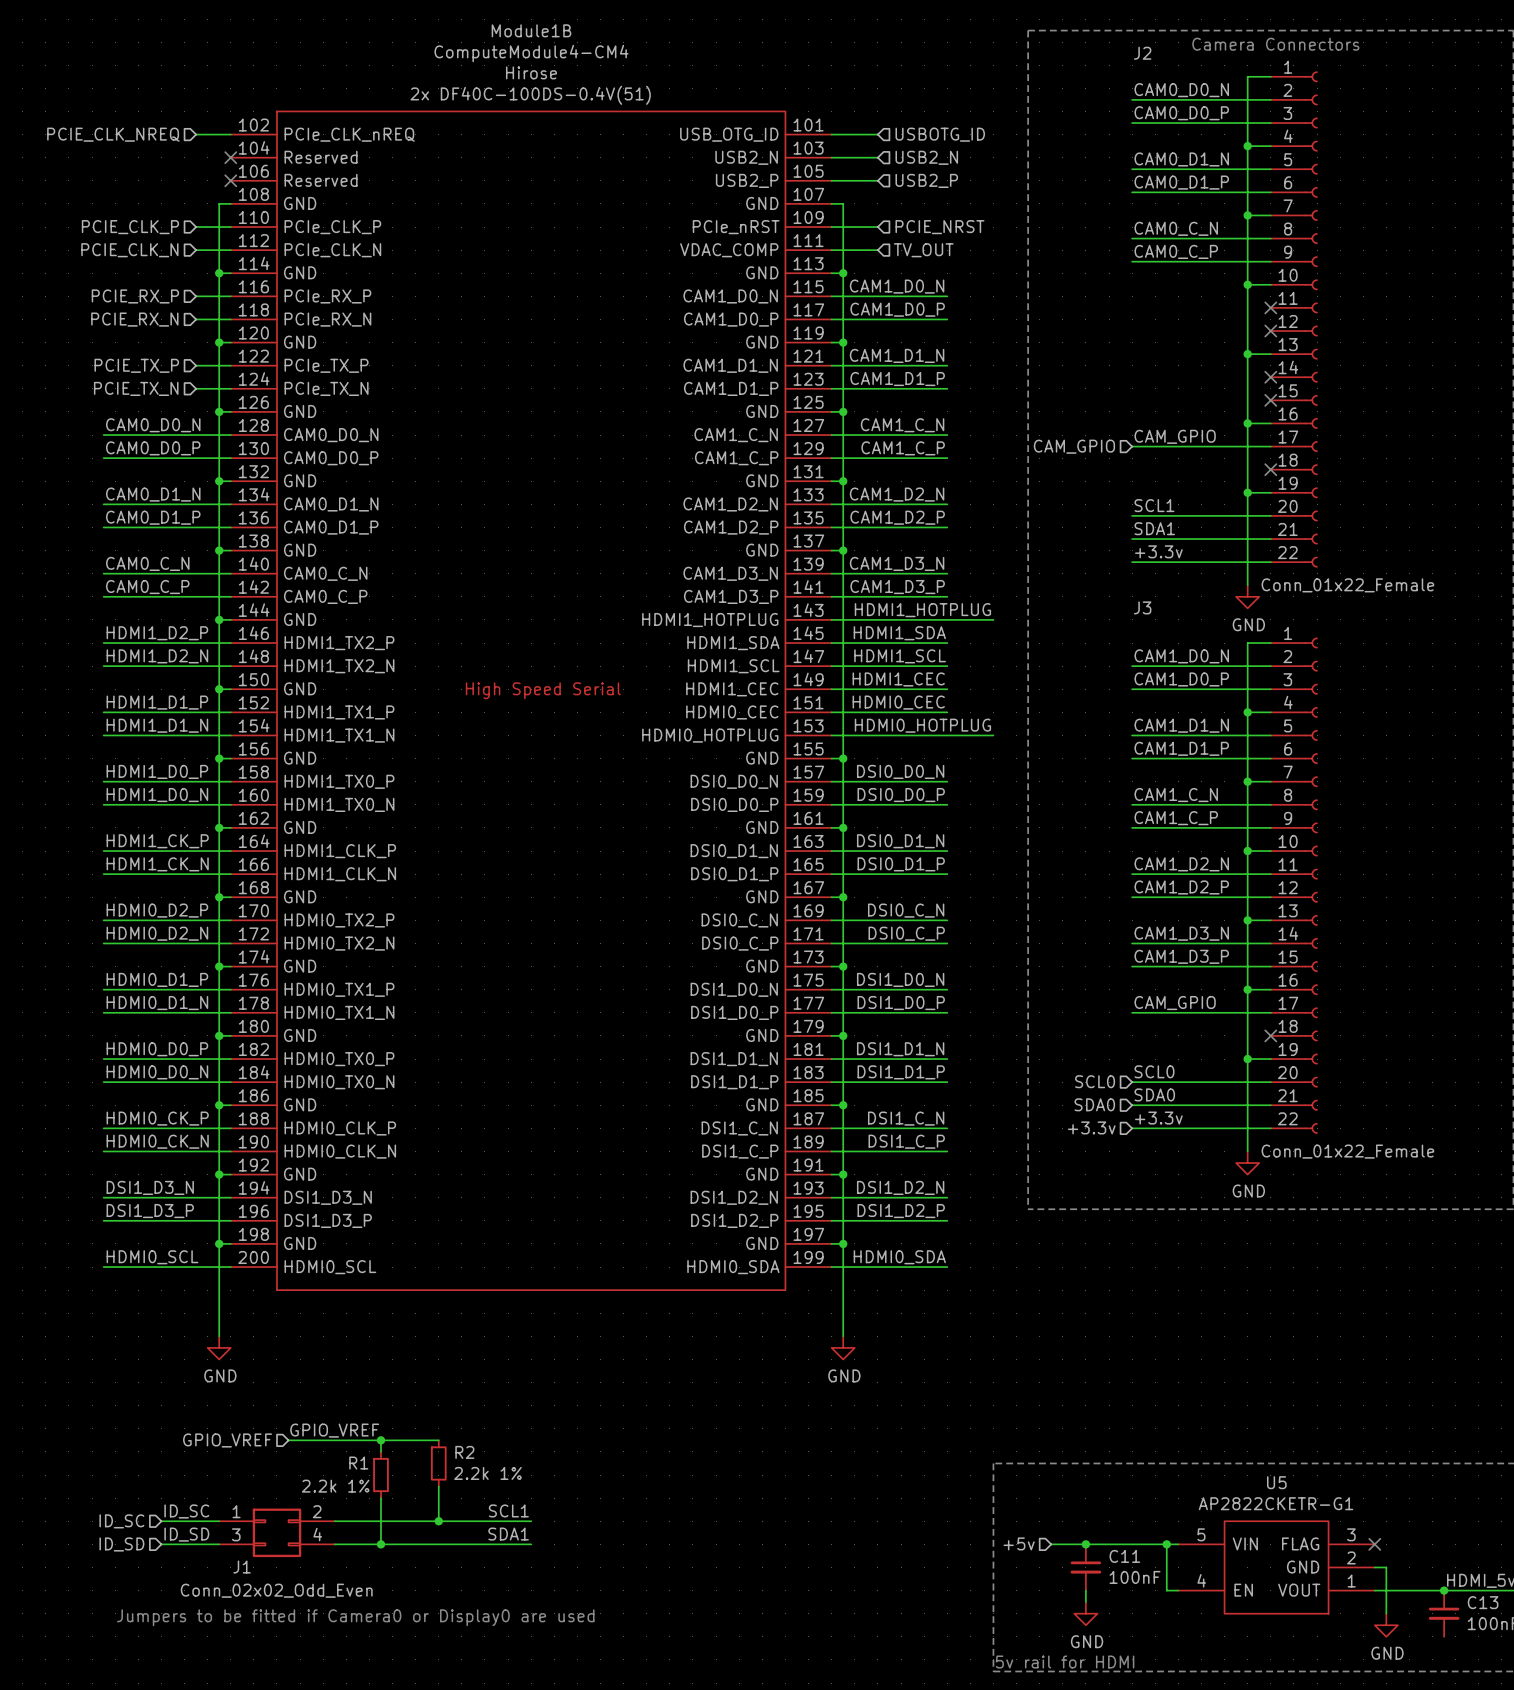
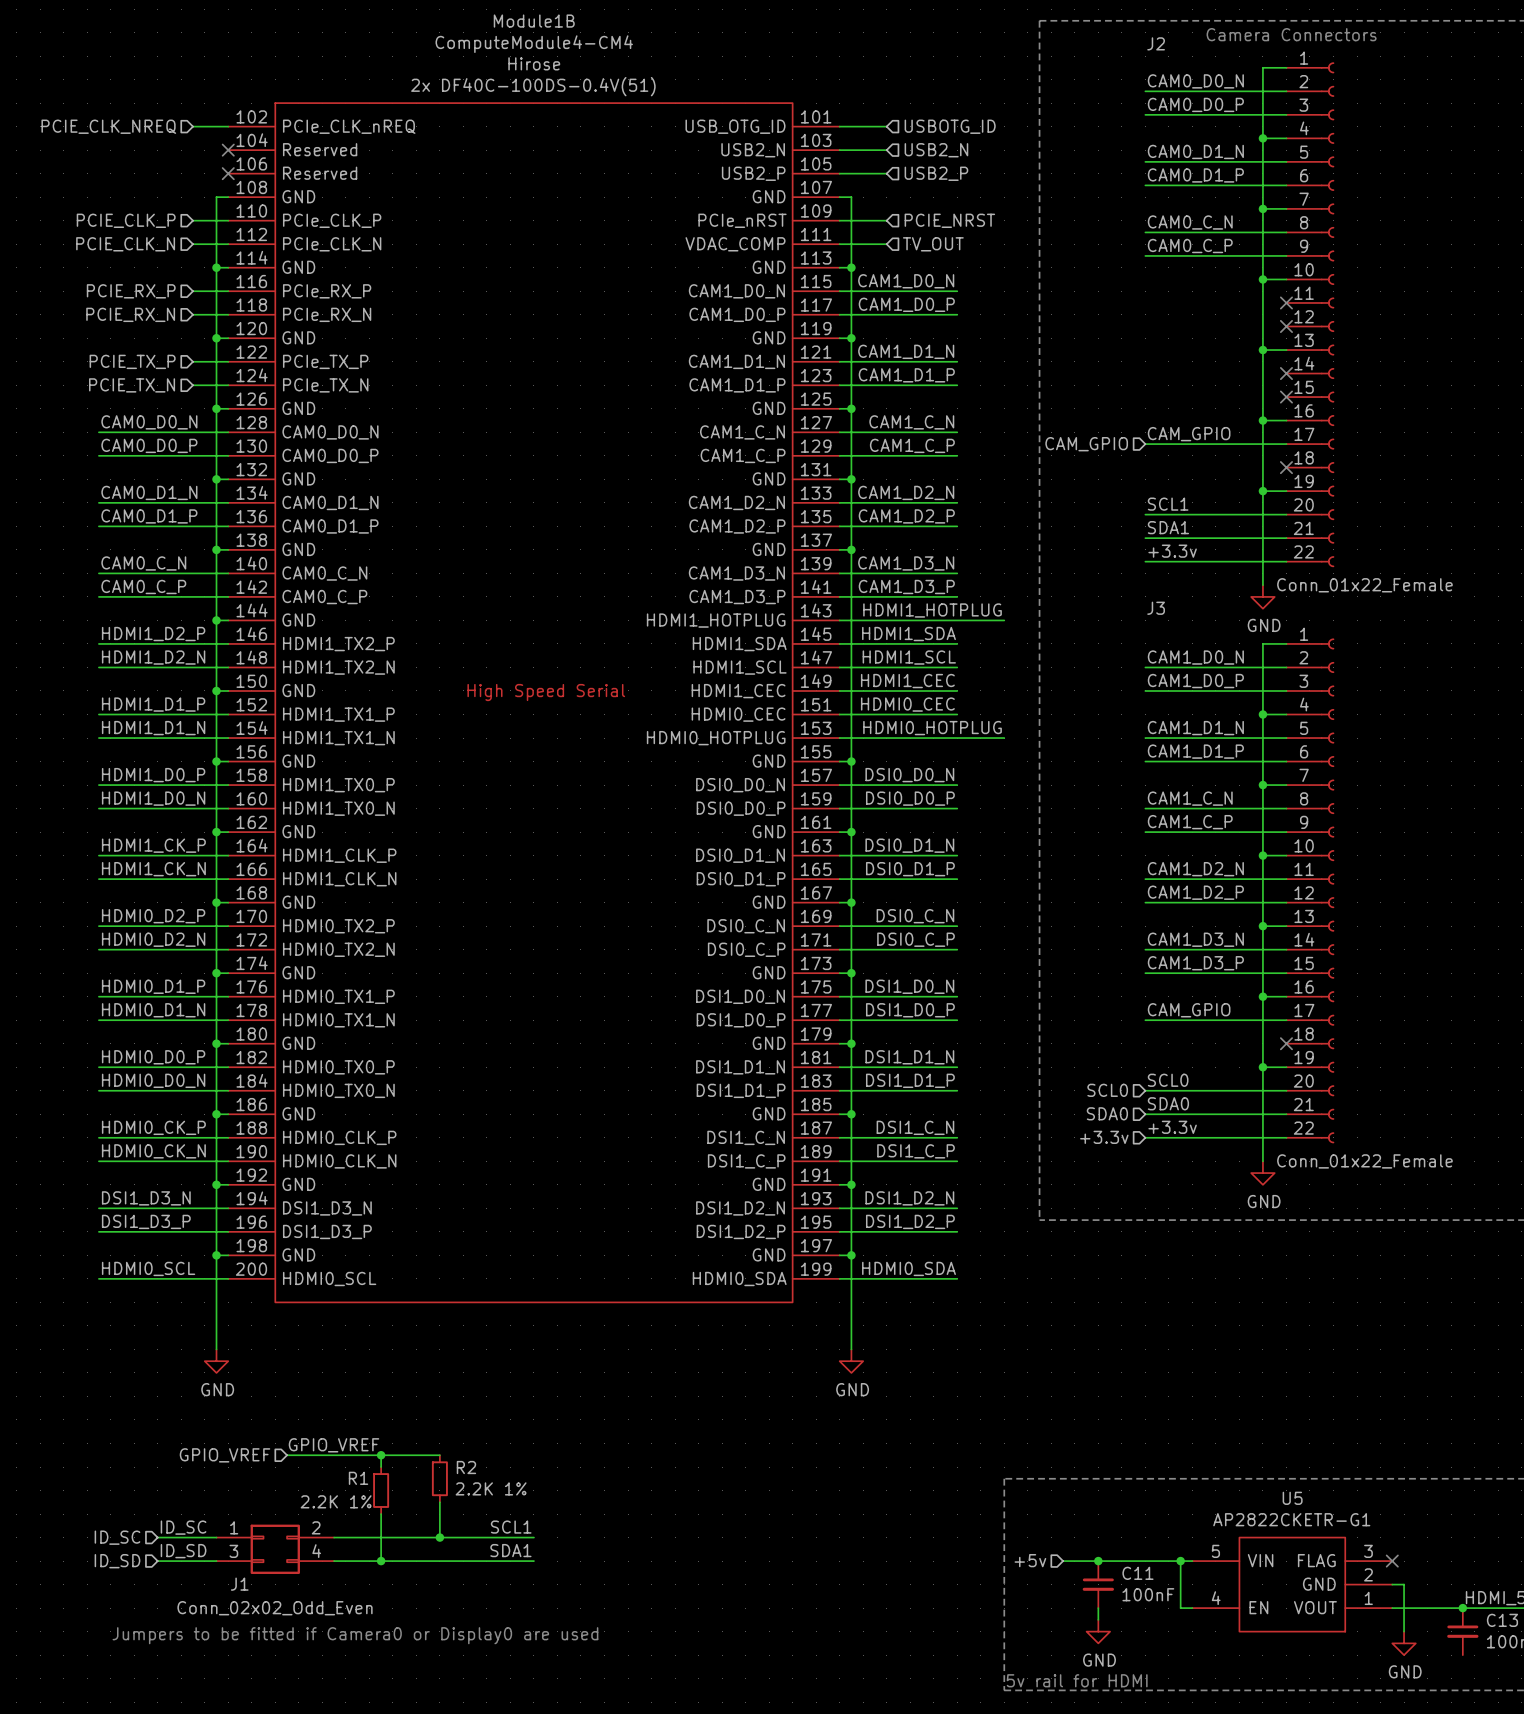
R2 value: 2.2k 1% (487, 1473) -> 2.2K 1% (491, 1488)
R1 value: 2.2k 1% (335, 1486) -> 2.2K 1% (336, 1501)

